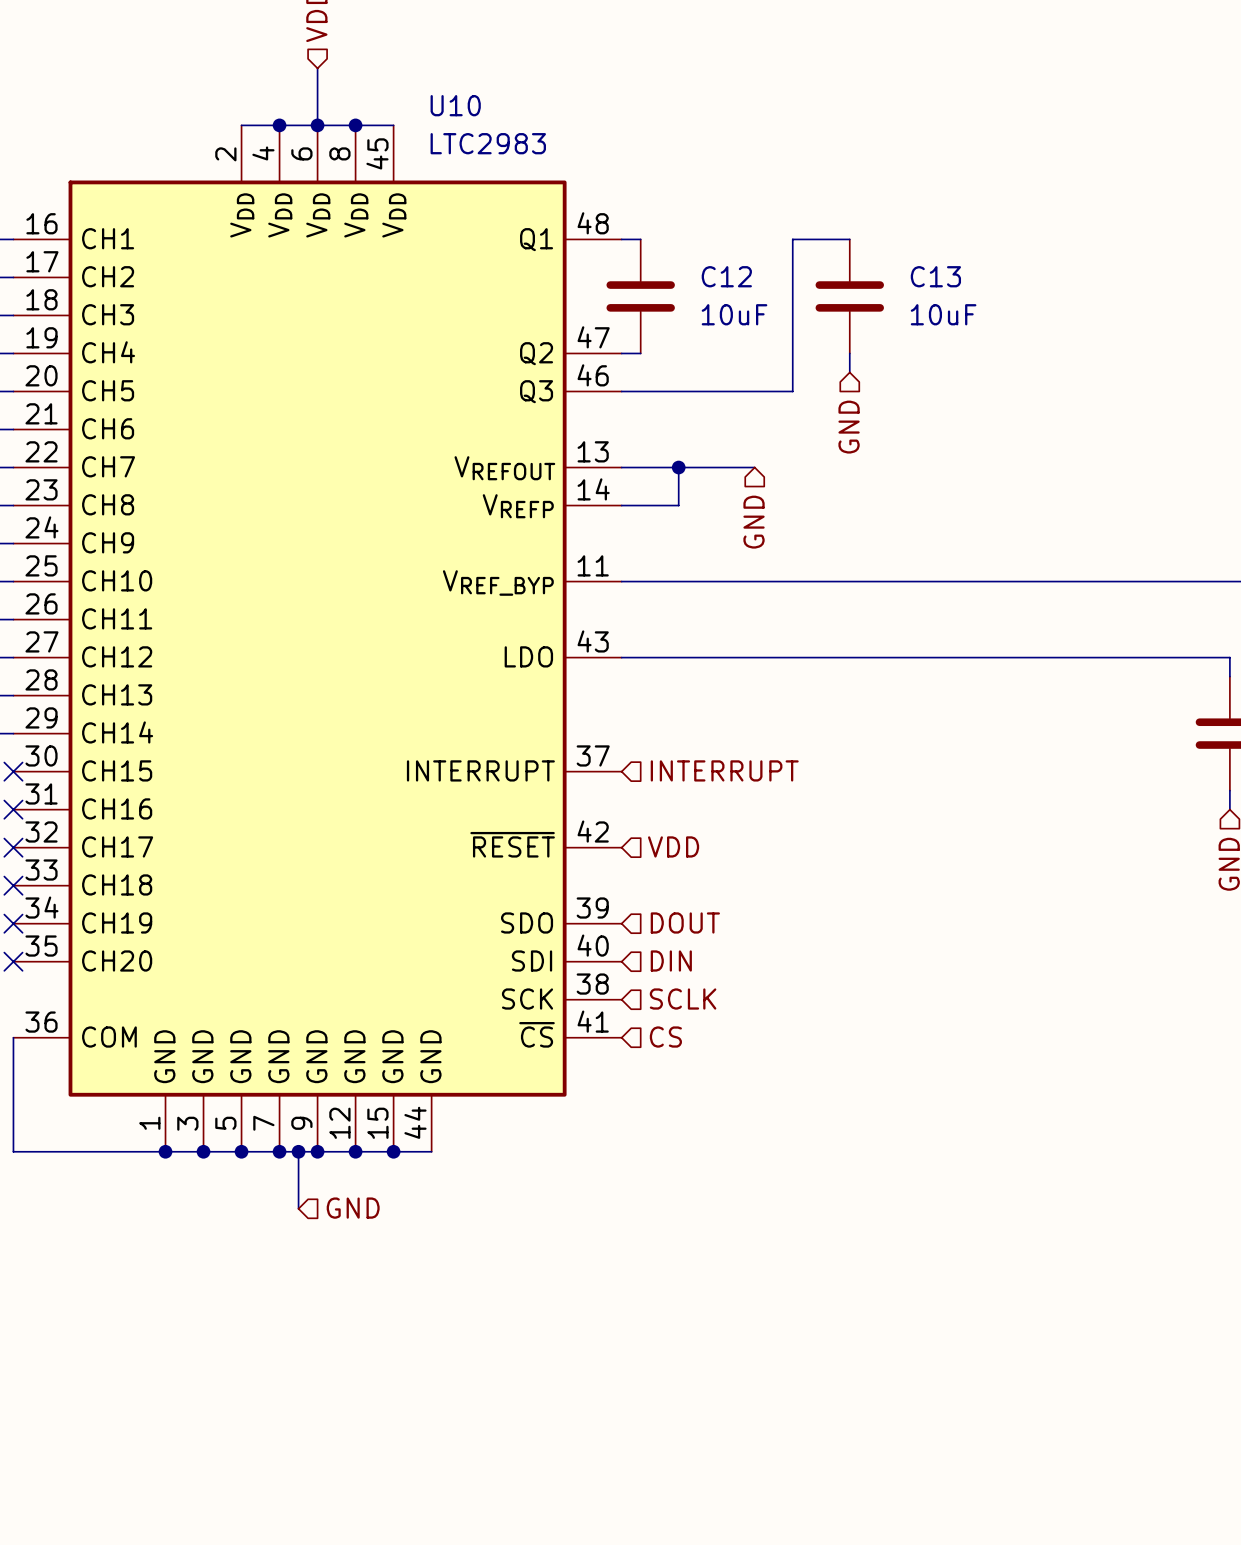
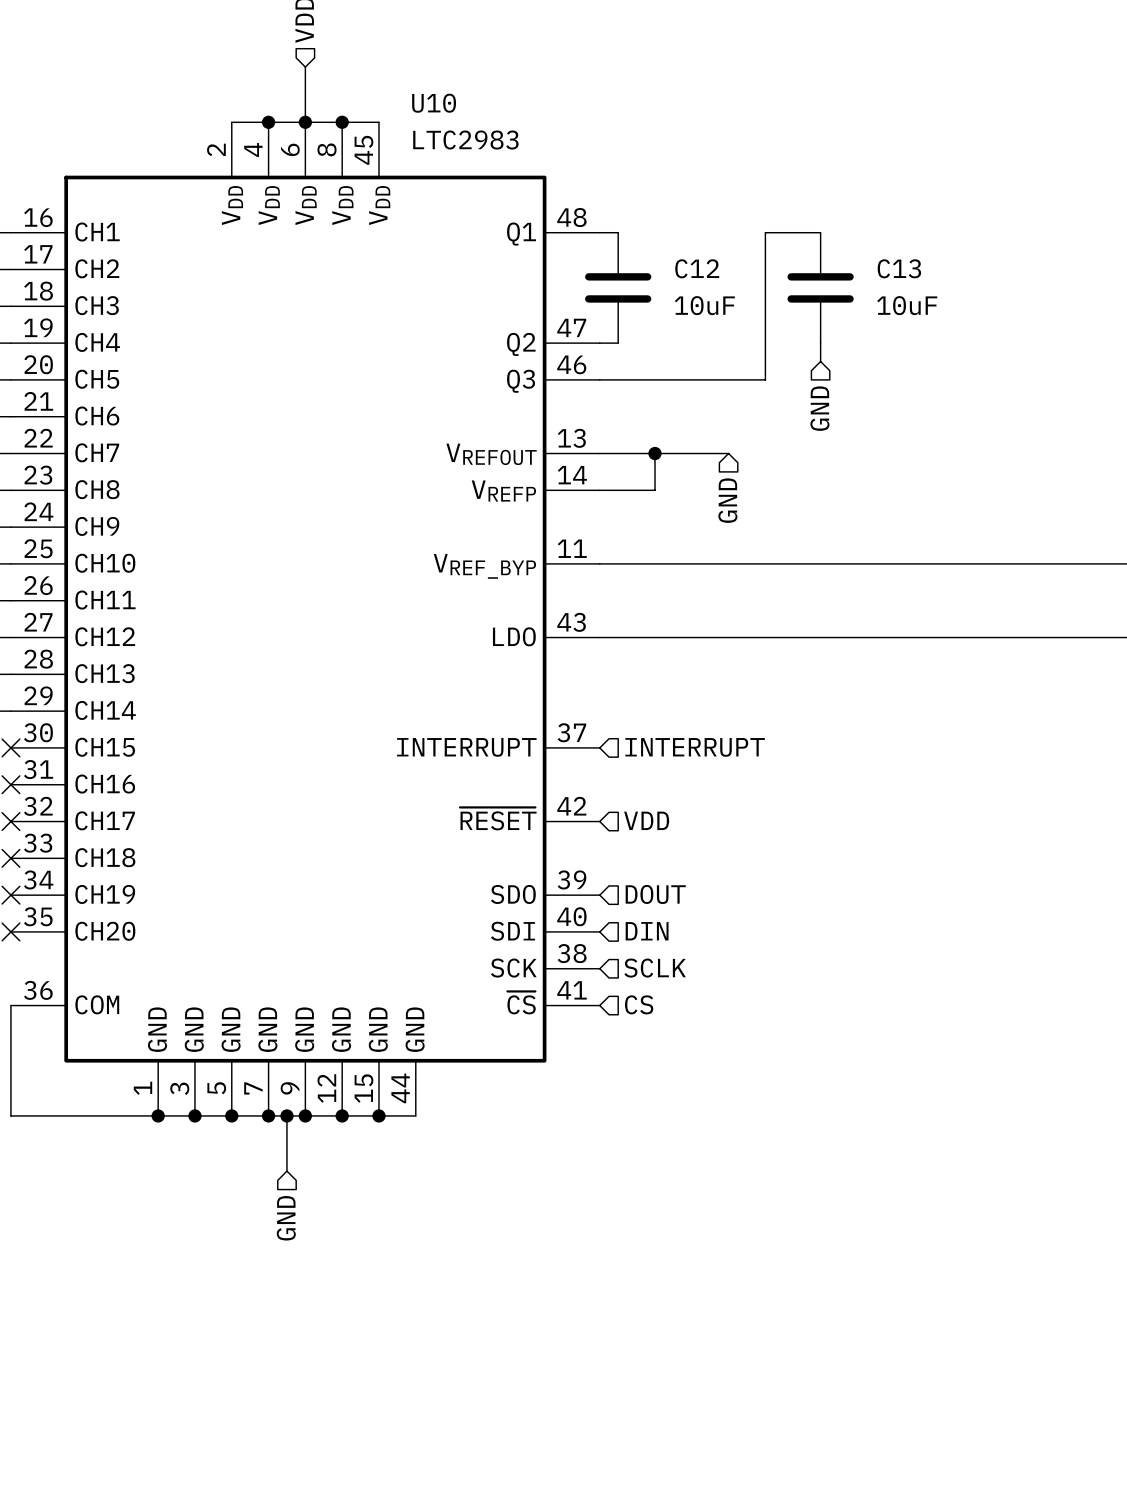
hierarchical label rotation: 0° (353, 1208) -> 90° clockwise (286, 1218)
hierarchical label position: GND (353, 1208) -> GND (286, 1218)

